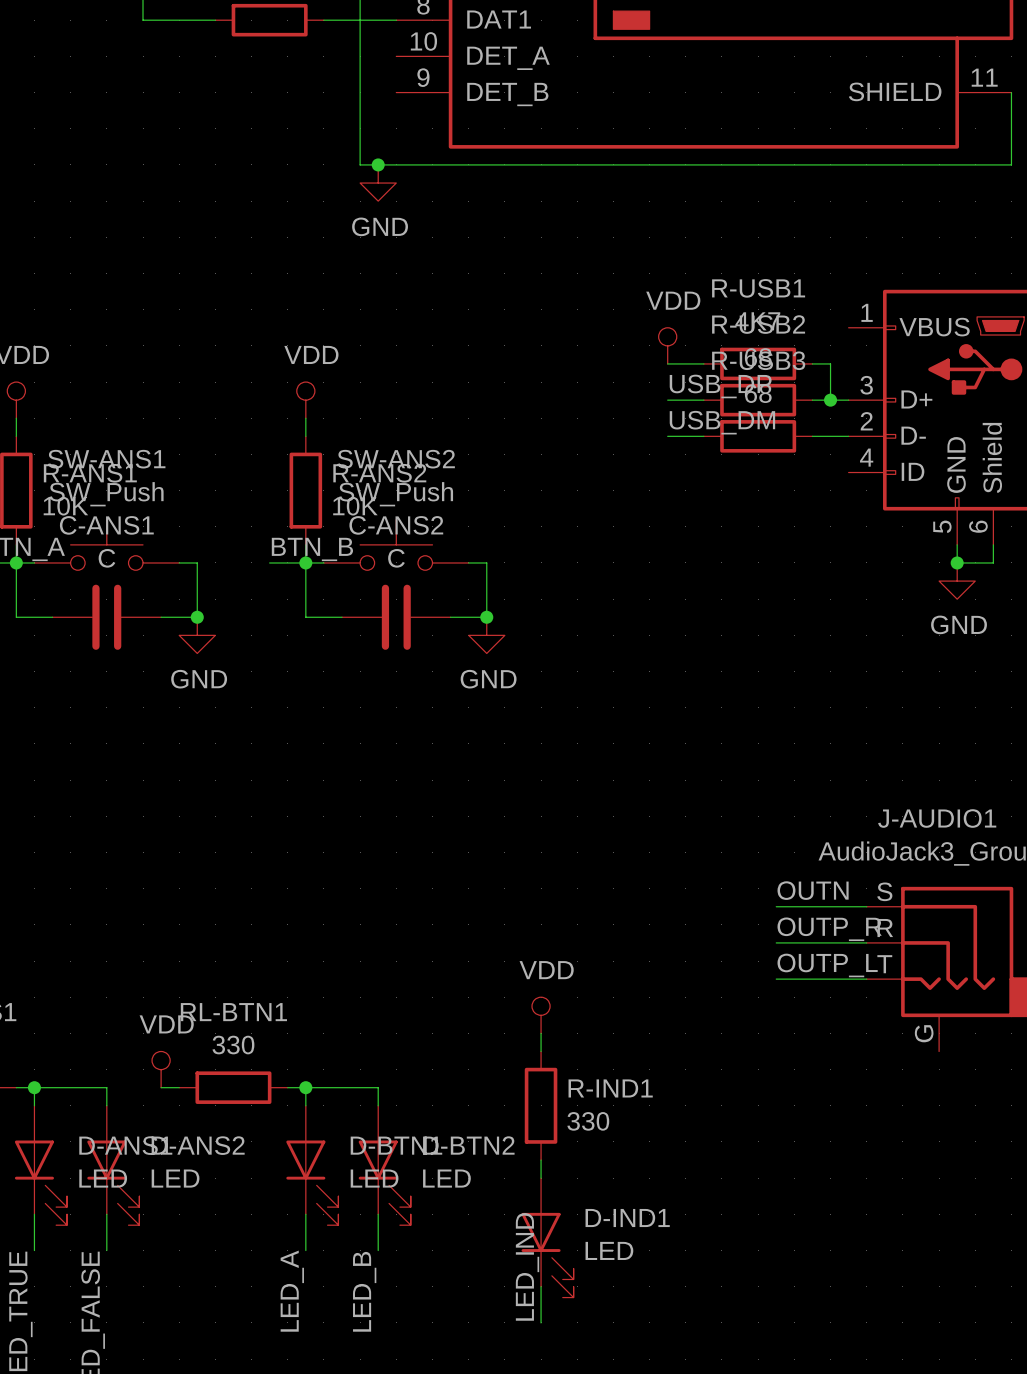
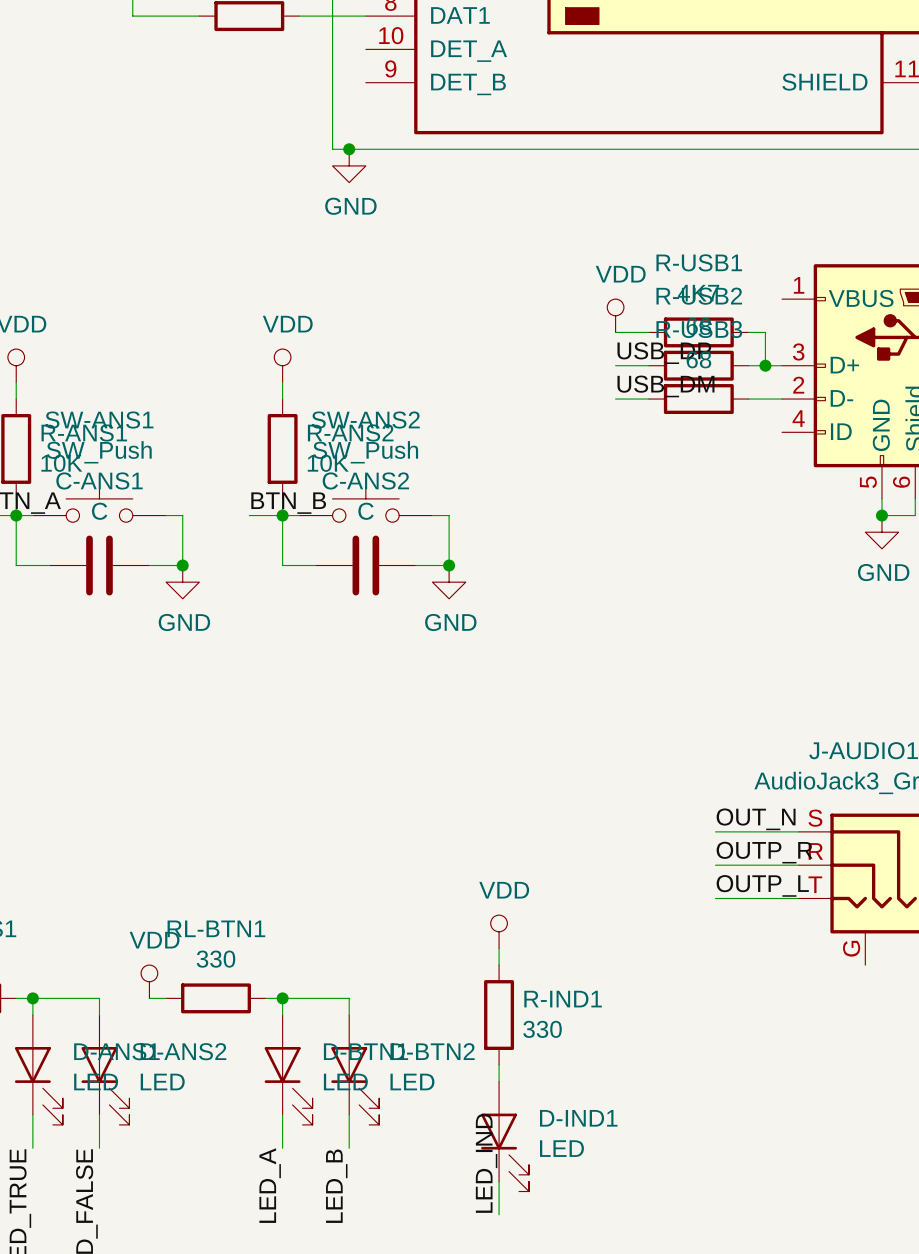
label: OUTN (813, 890) -> OUT_N (756, 819)

